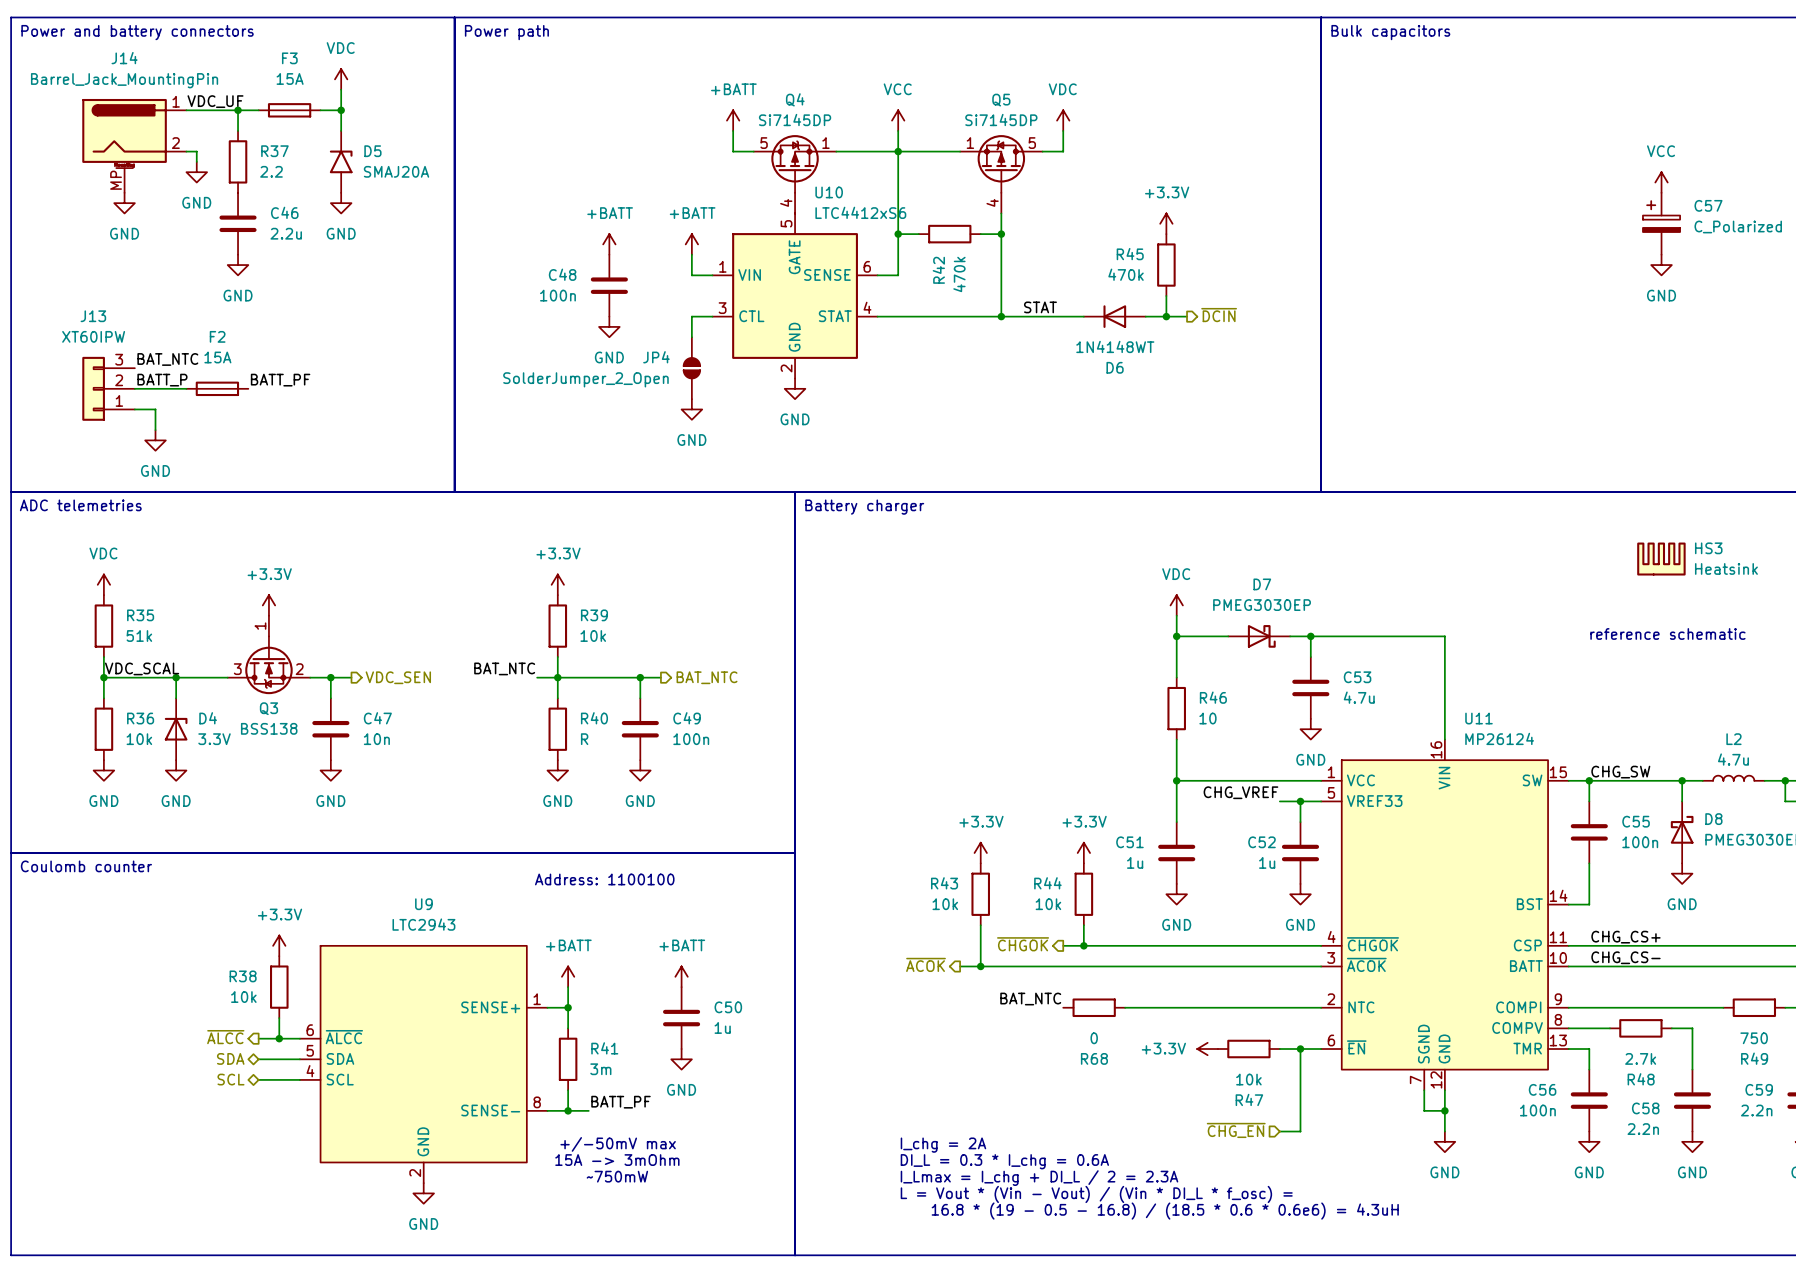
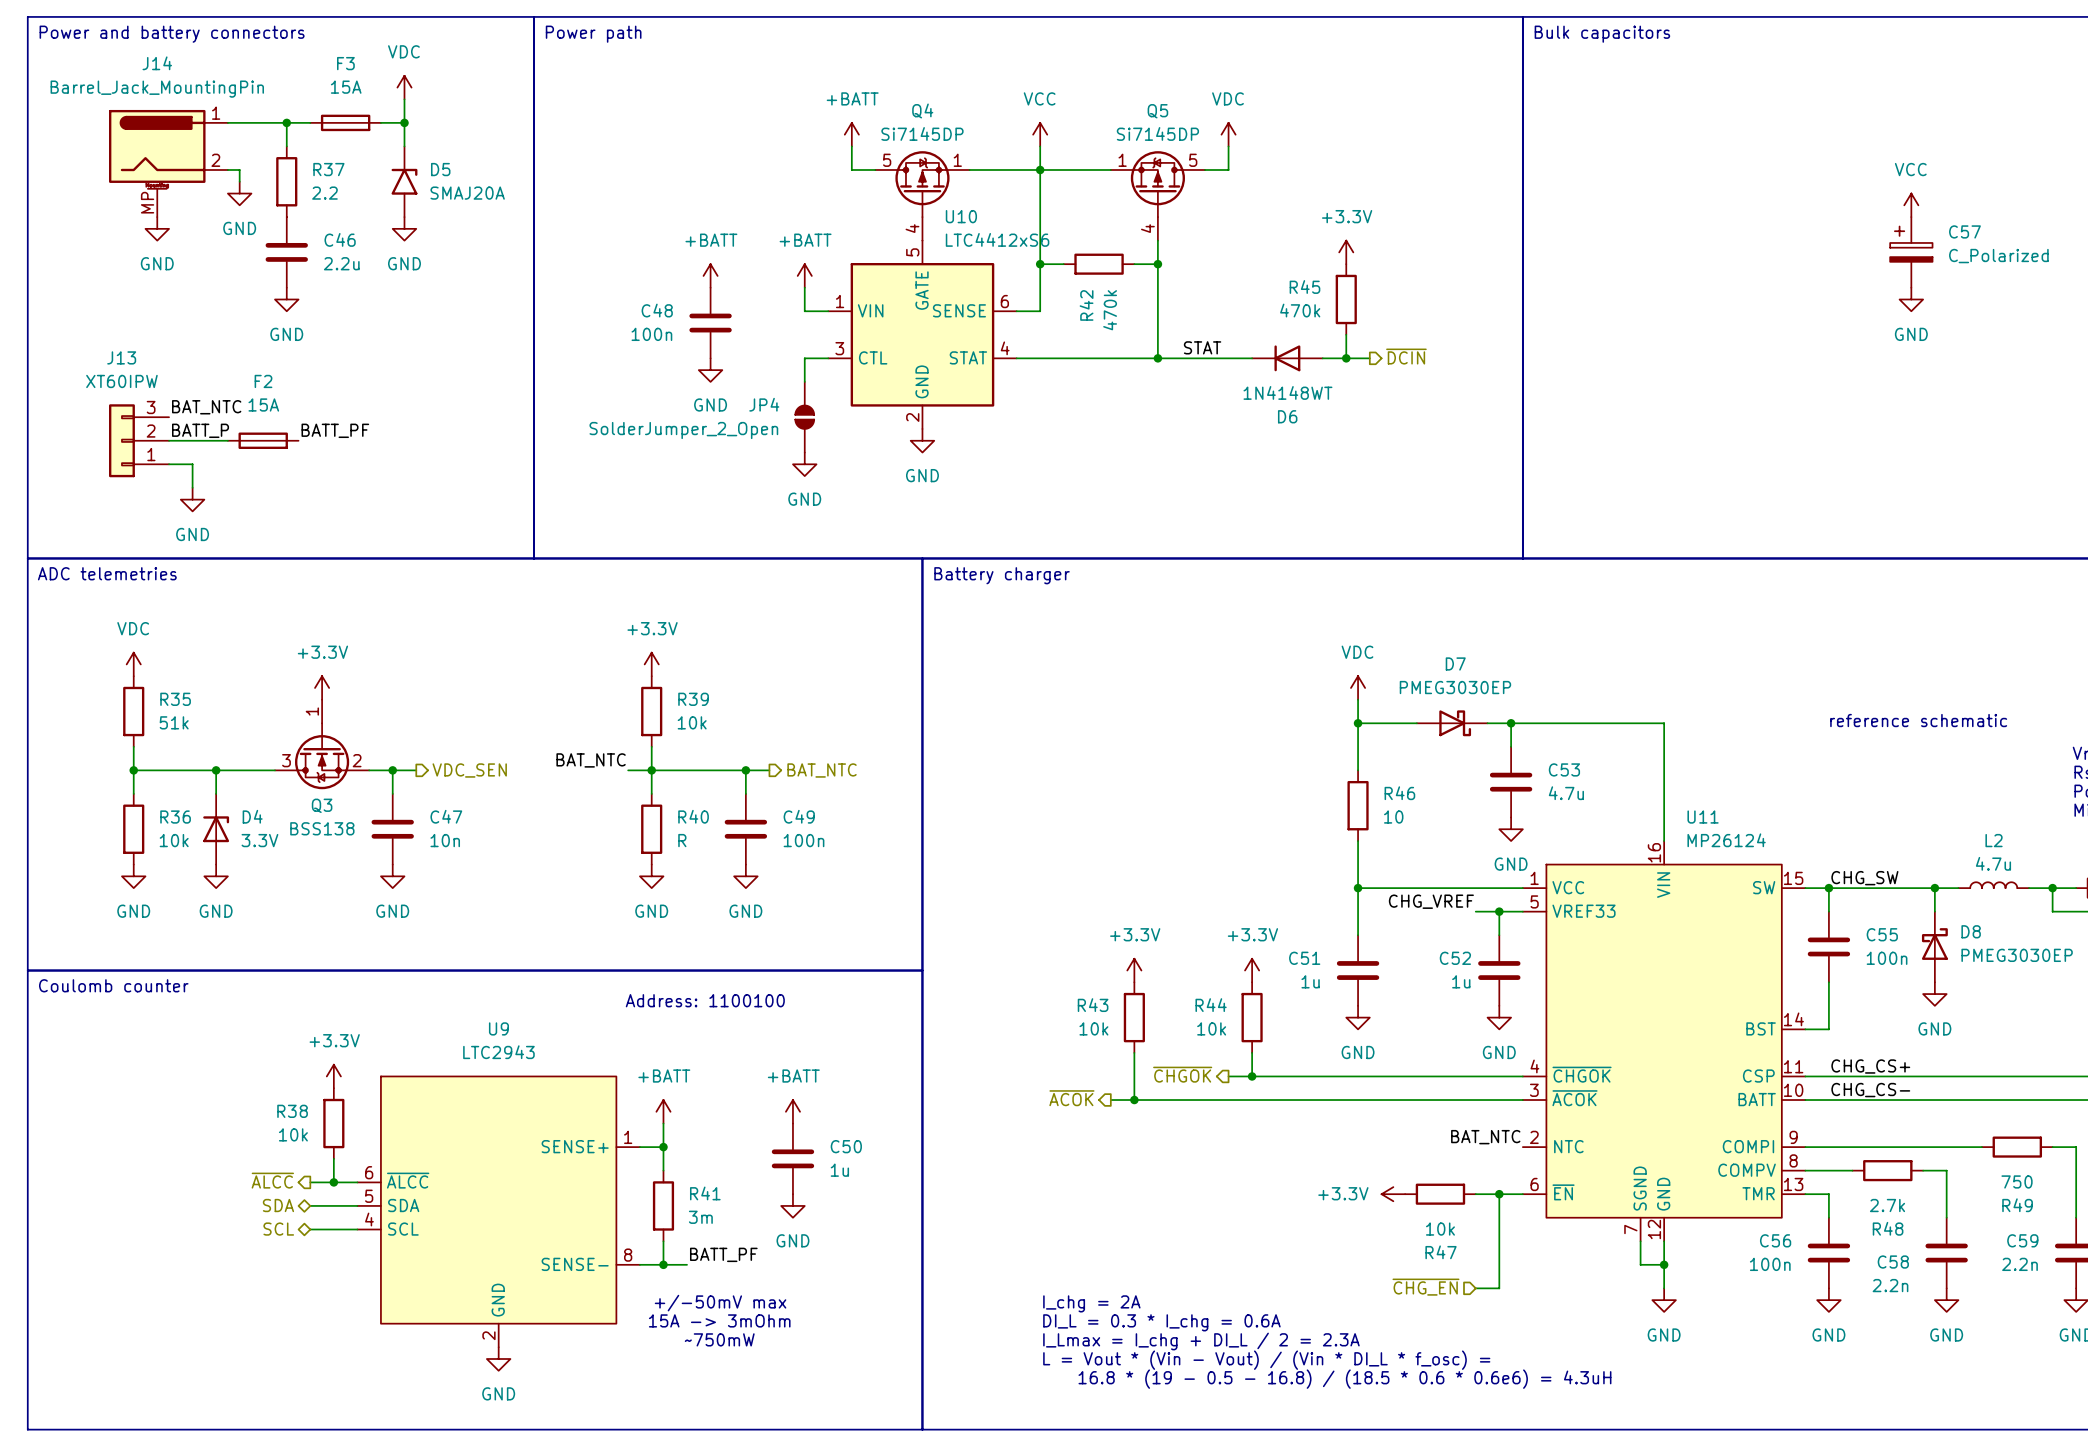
label: VDC_UF (215, 101) -> none
HS3: Heatsink (1661, 559) -> none
label: VDC_SCAL (142, 668) -> none
label: BAT_NTC (1030, 999) -> none
label: none -> BAT_NTC (1485, 1137)
R68: 0 (1094, 1007) -> none
wire: (1125, 1007) (1321, 1007) -> none

